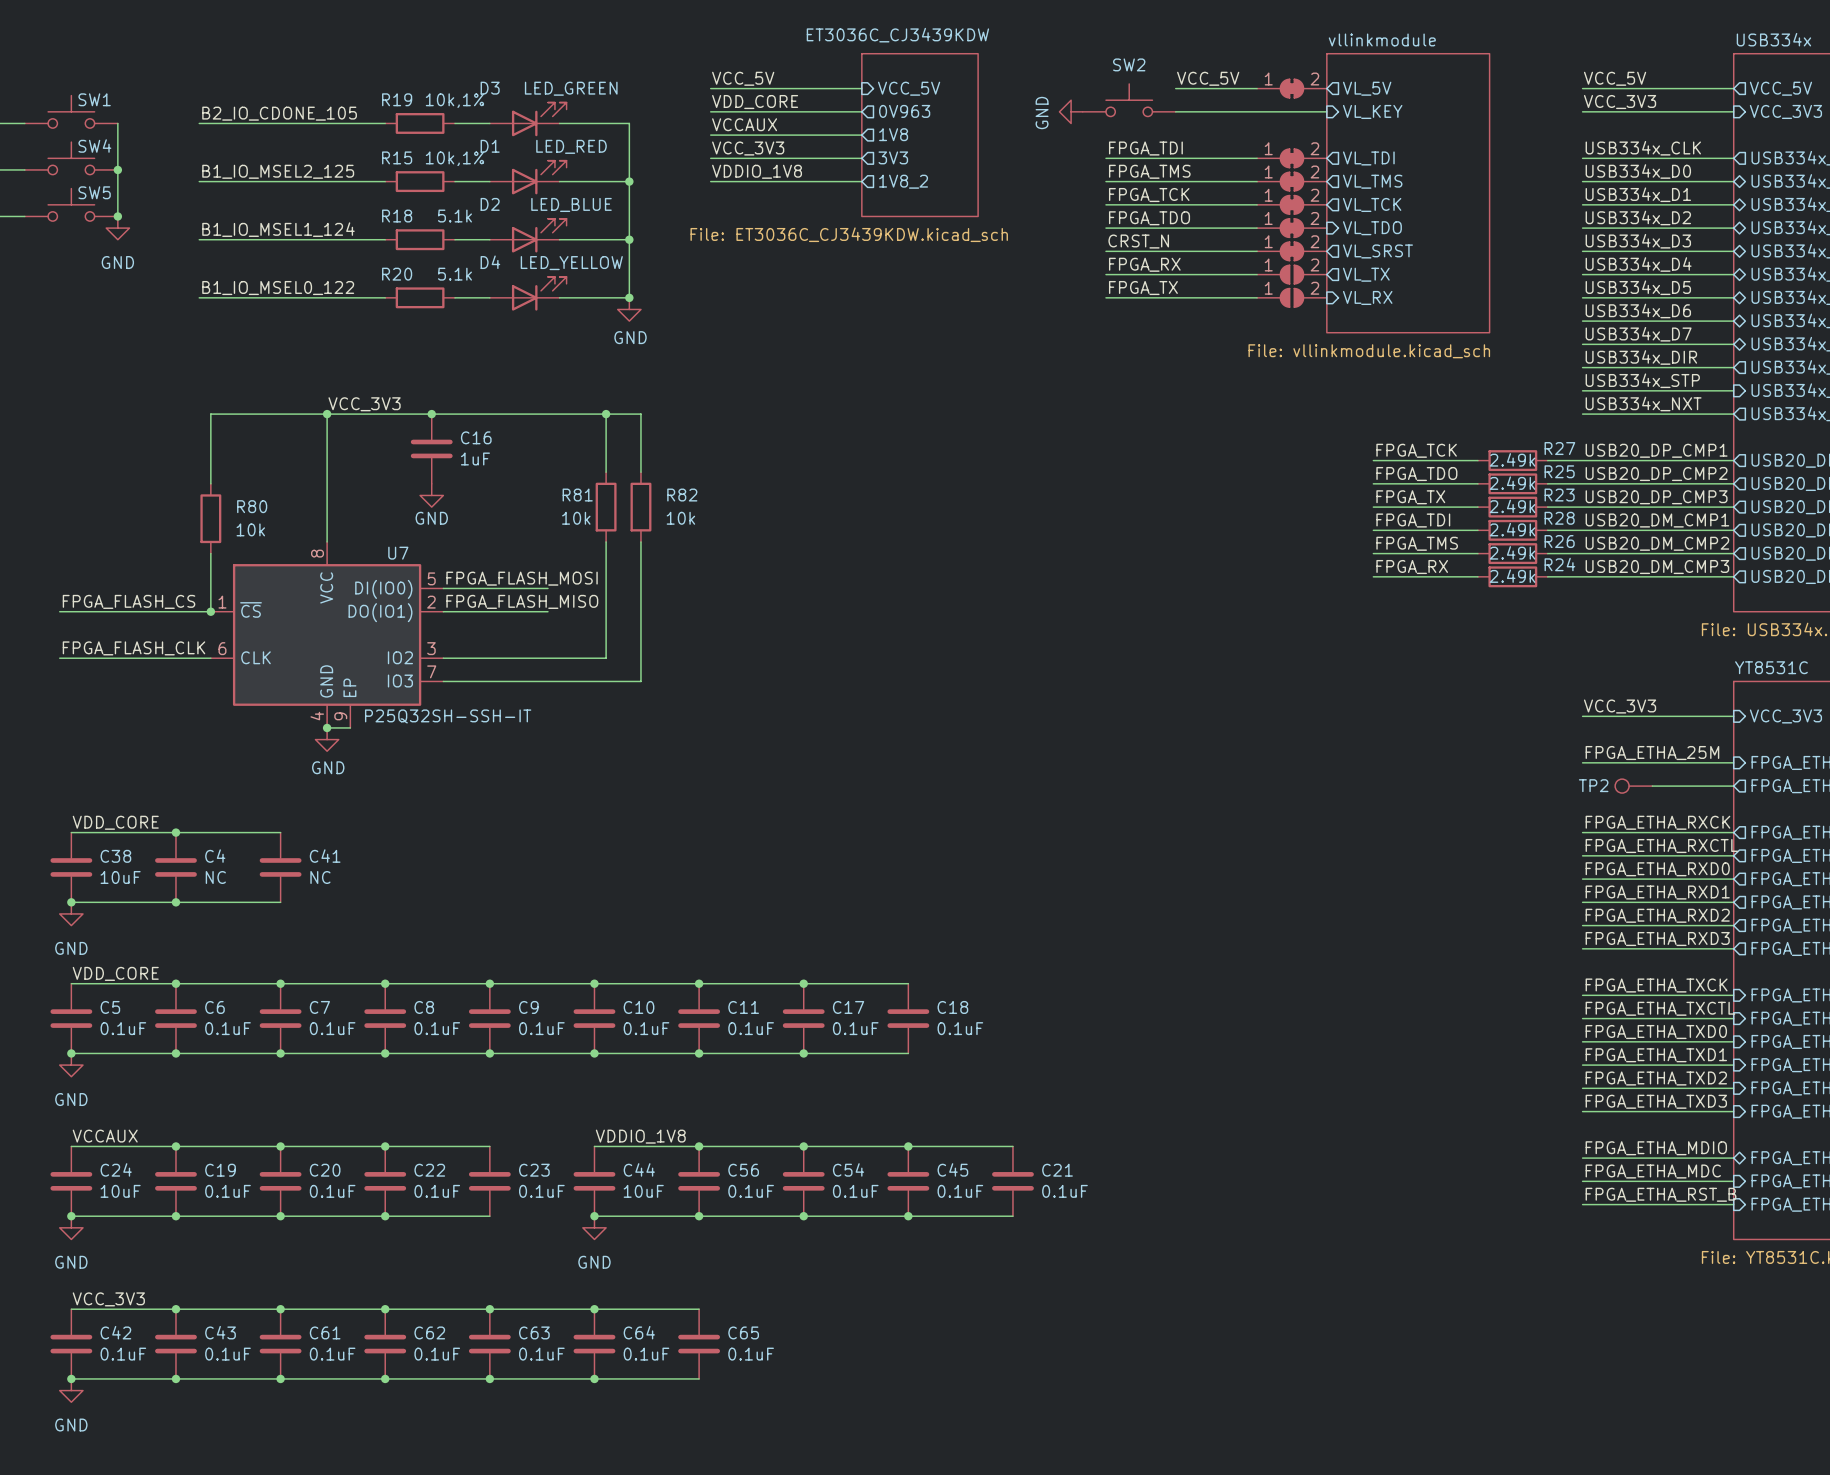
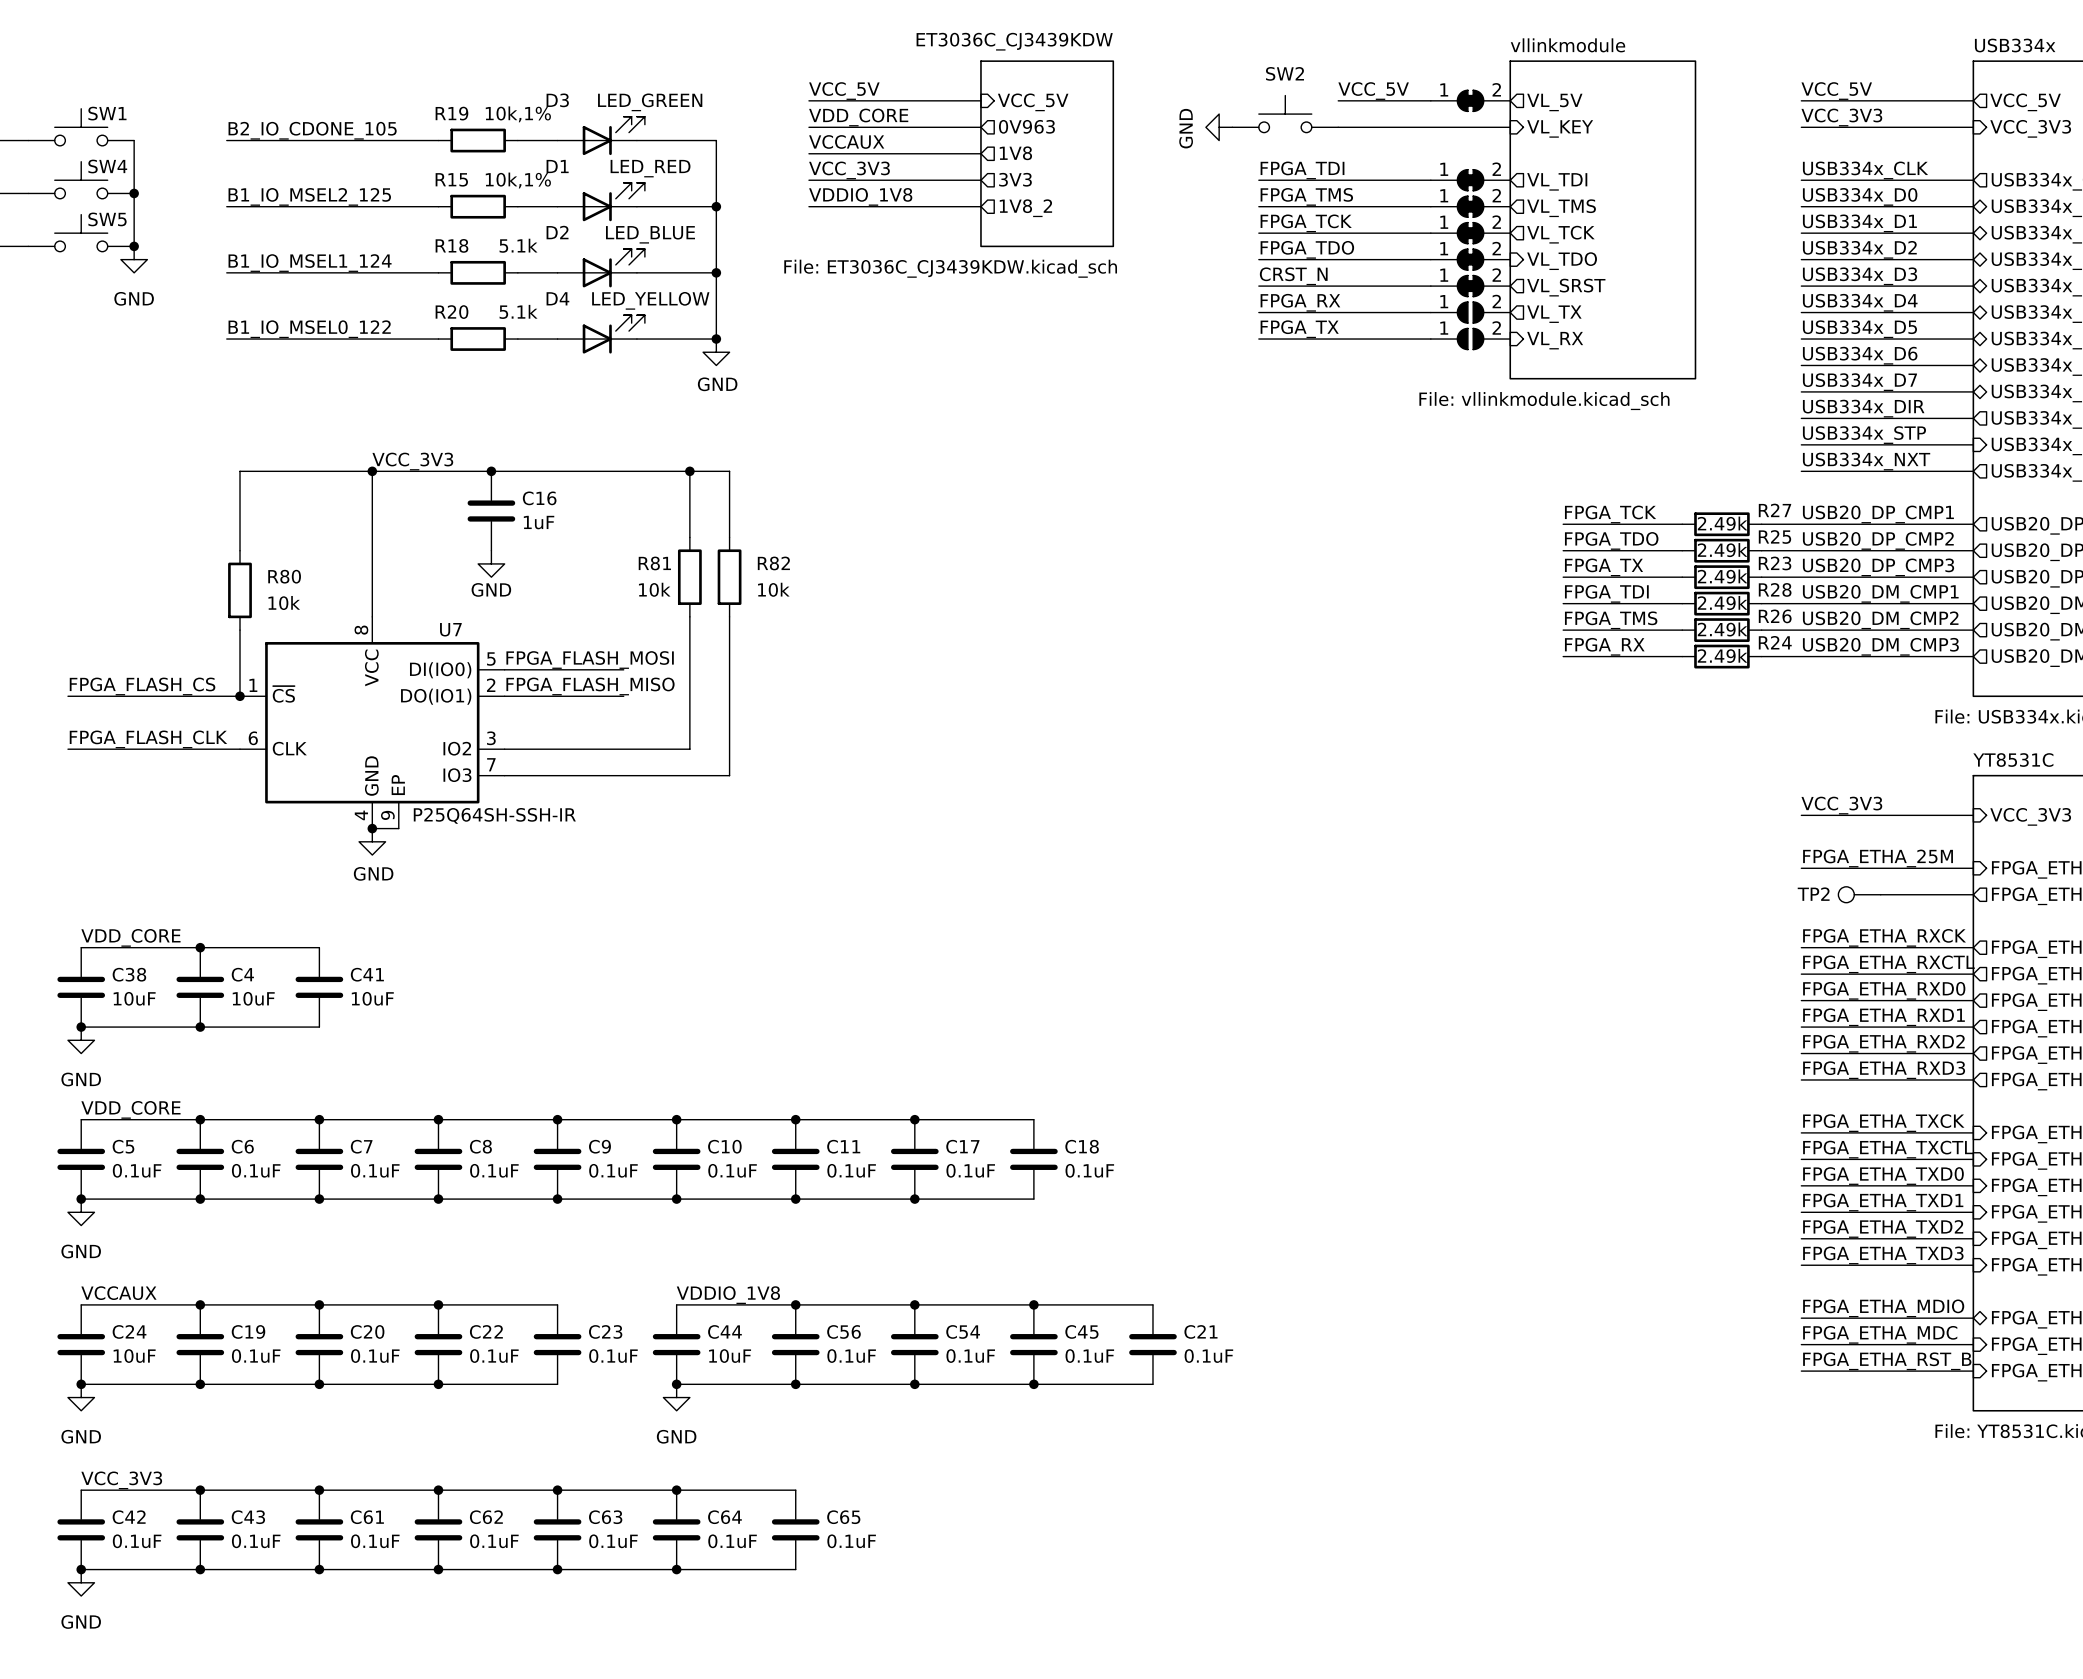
U7 value: P25Q32SH-SSH-IT (448, 716) -> P25Q64SH-SSH-IR (494, 815)
C4 value: NC (215, 877) -> 10uF (253, 998)
C41 value: NC (320, 877) -> 10uF (372, 998)

